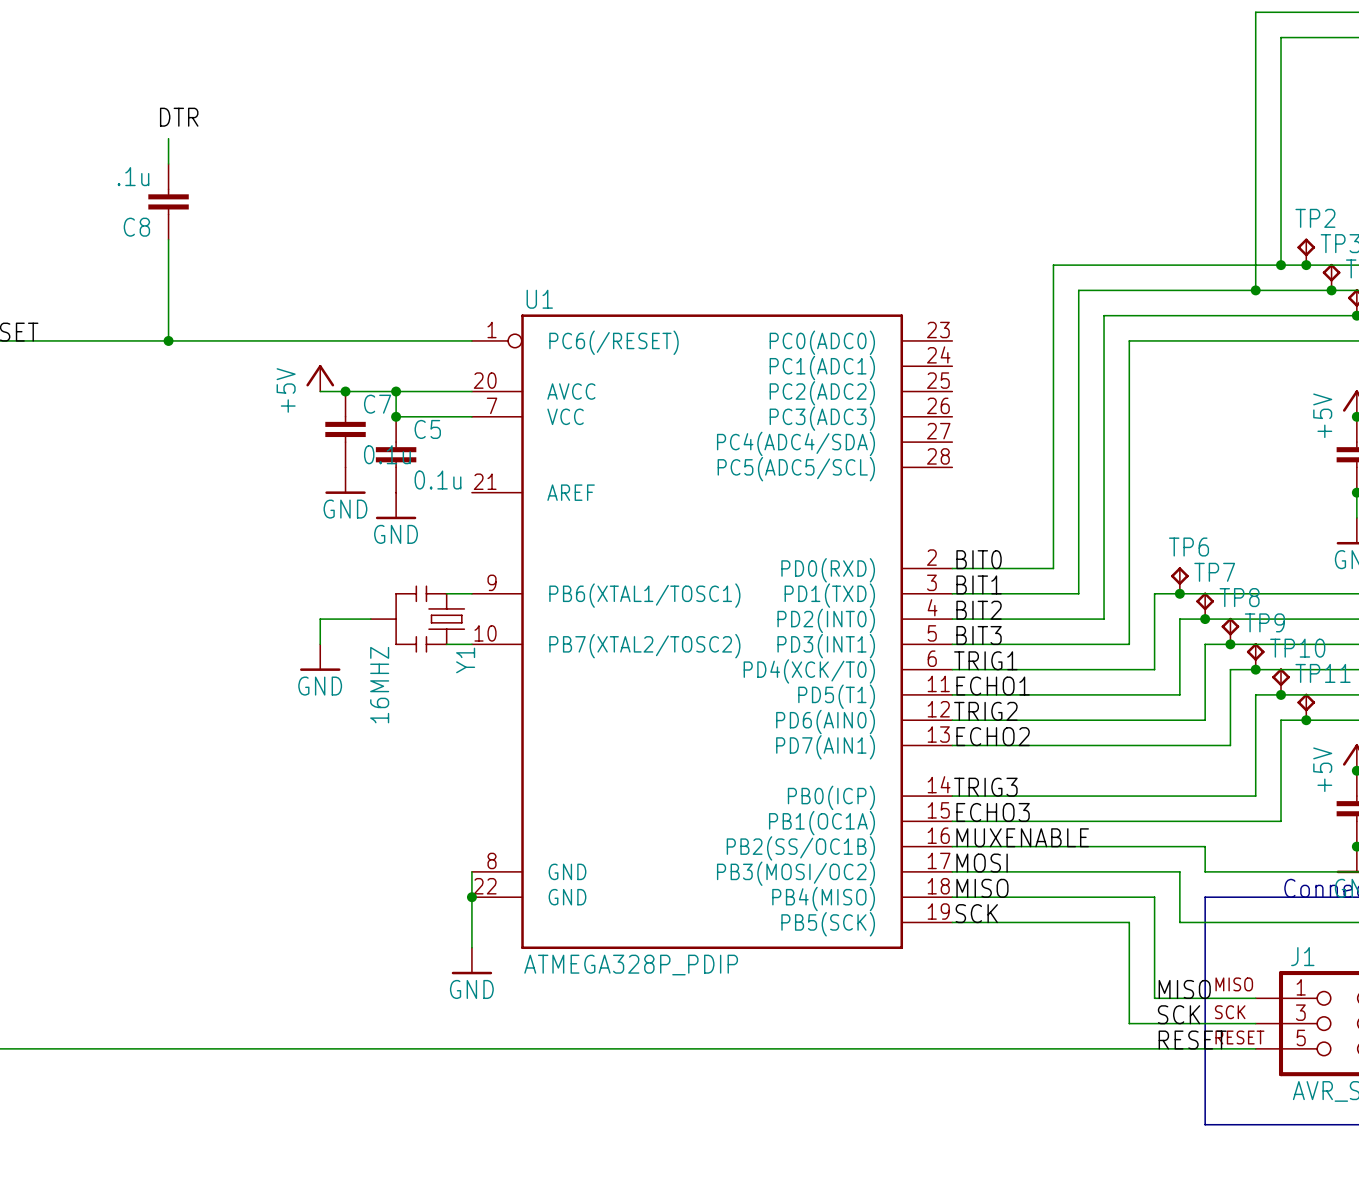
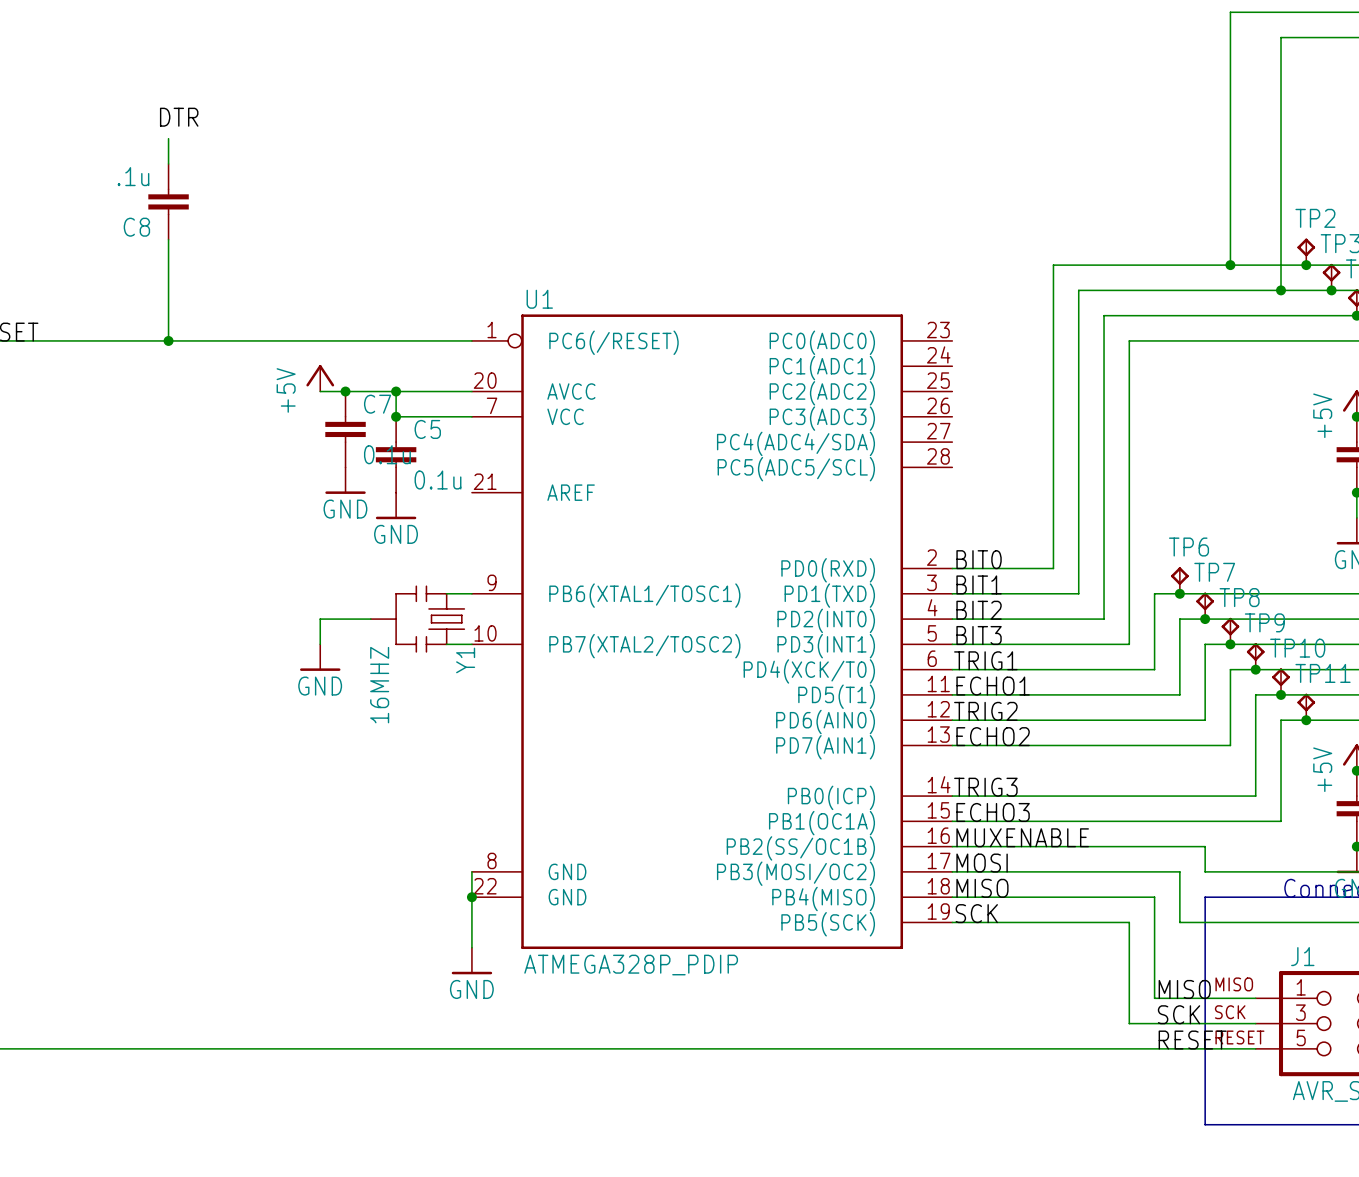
wire: (1255, 12) (1255, 290) -> (1255, 12) (1230, 12) (1230, 265)
junction: none -> (1230, 265)
wire: none -> (1281, 265) (1281, 290)
junction: (1281, 265) -> none
junction: (1255, 290) -> none
junction: none -> (1281, 290)

